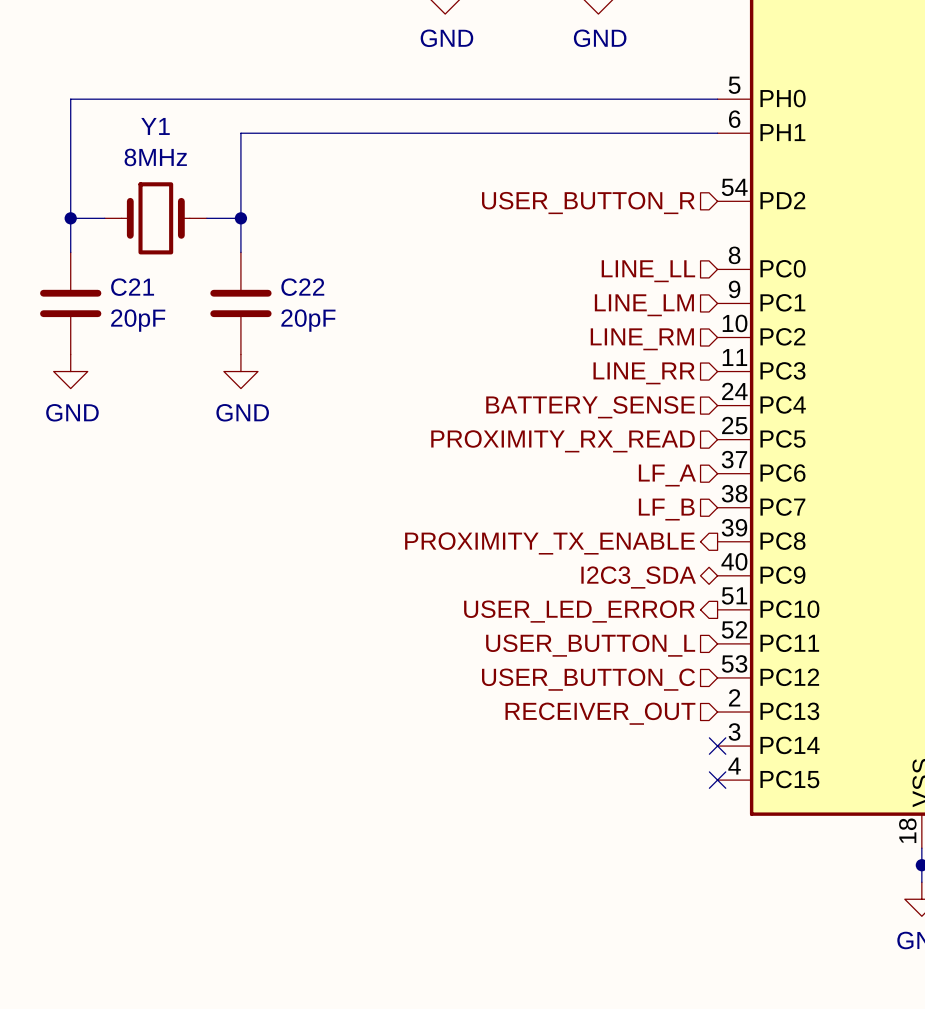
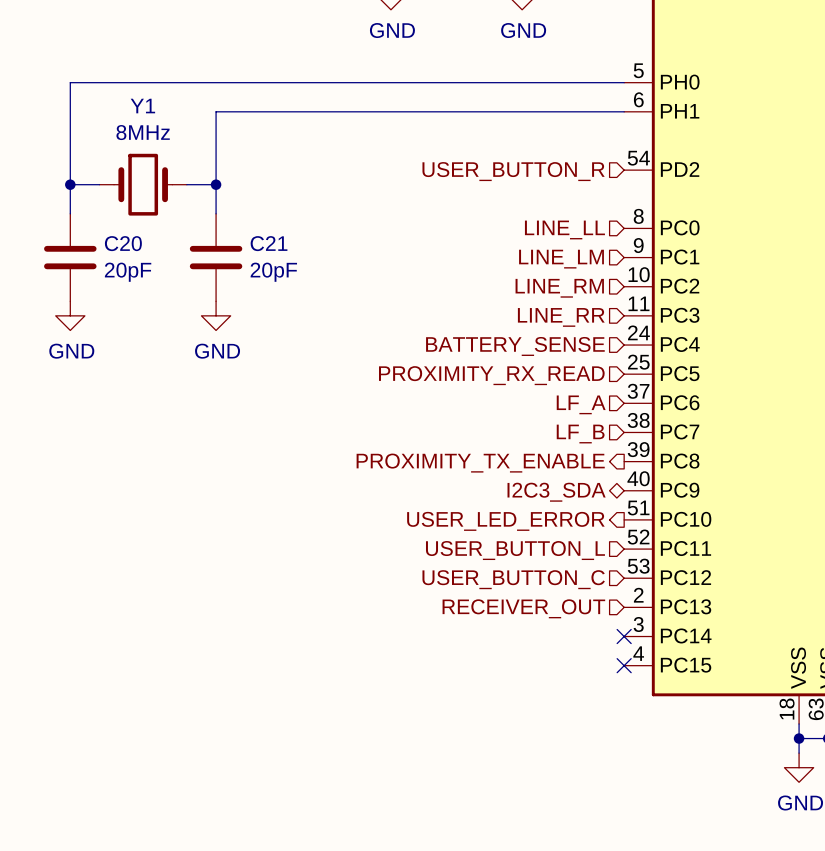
C21 name: C21 (132, 287) -> C20 (123, 243)
C22 name: C22 (302, 287) -> C21 (269, 243)

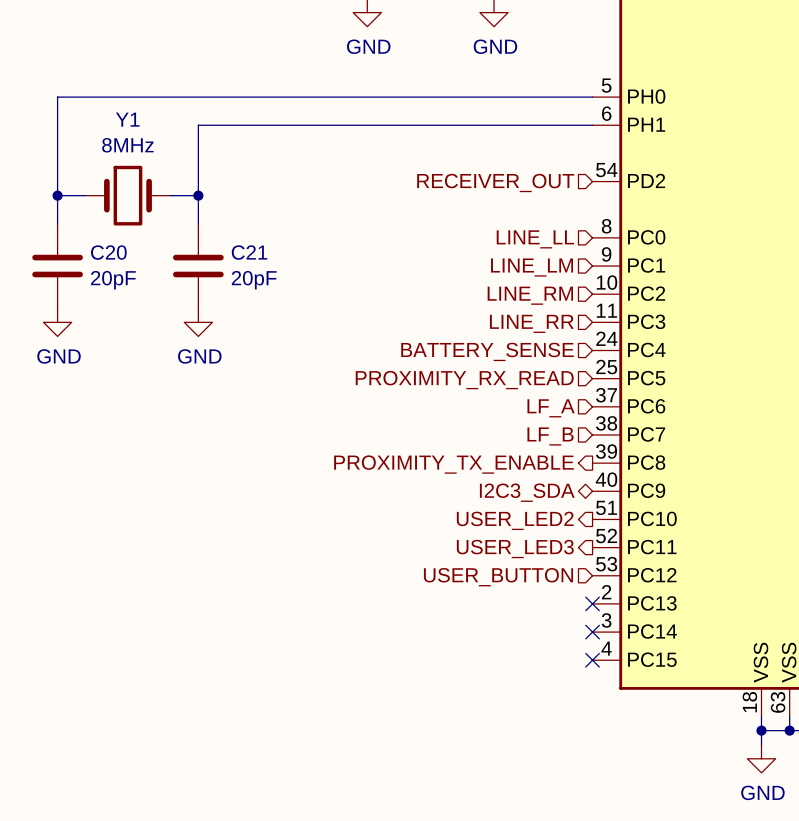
hierarchical label: USER_BUTTON_R (513, 171) -> RECEIVER_OUT (495, 182)
hierarchical label: USER_LED_ERROR (505, 521) -> USER_LED2 (515, 520)
hierarchical label shape: input (515, 550) -> output (515, 549)
hierarchical label: USER_BUTTON_L (515, 550) -> USER_LED3 (515, 549)
hierarchical label: USER_BUTTON_C (513, 579) -> USER_BUTTON (498, 577)
no-connect mark: none -> (592, 603)
hierarchical label: RECEIVER_OUT (523, 608) -> none

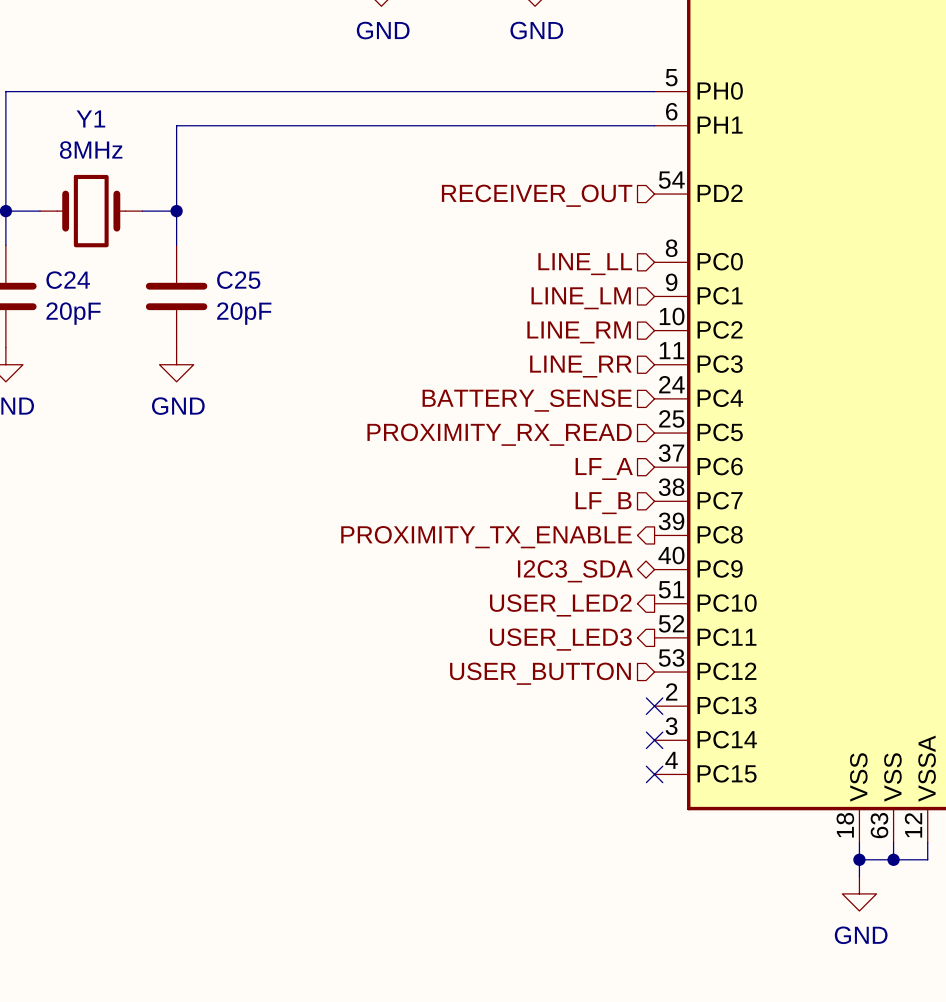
C20 name: C20 (108, 252) -> C24 (68, 280)
C21 name: C21 (249, 252) -> C25 (238, 280)

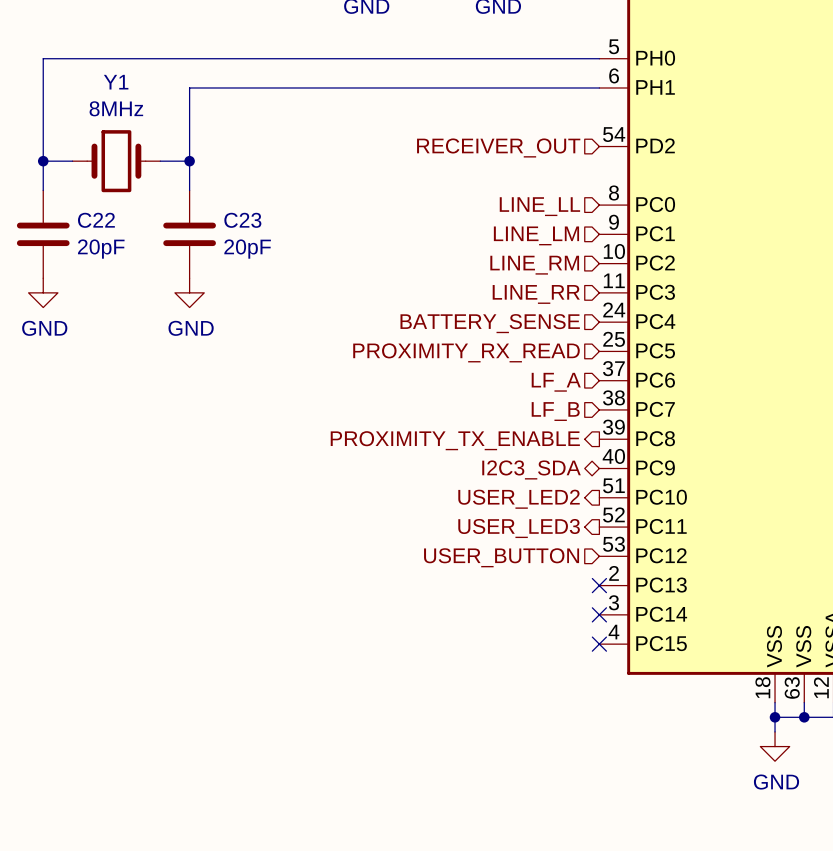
C24 name: C24 (68, 280) -> C22 (96, 220)
C25 name: C25 (238, 280) -> C23 (242, 220)

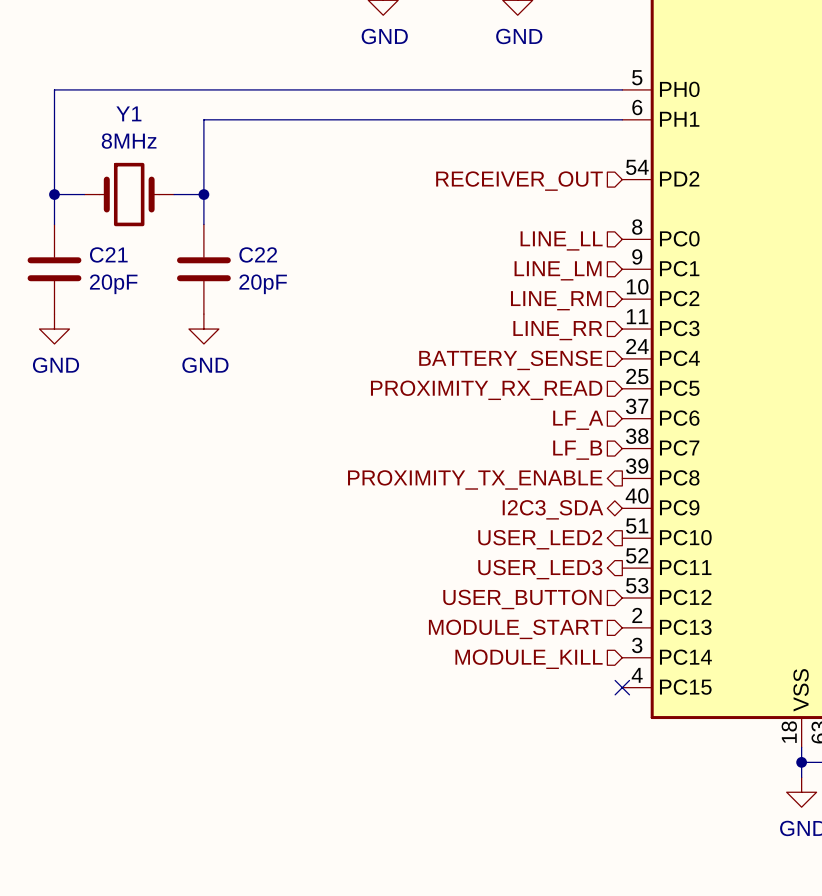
C22 name: C22 (96, 220) -> C21 (108, 254)
C23 name: C23 (242, 220) -> C22 (258, 254)
no-connect mark: (599, 585) -> none
hierarchical label: none -> MODULE_START (515, 629)
no-connect mark: (599, 614) -> none
hierarchical label: none -> MODULE_KILL (529, 659)

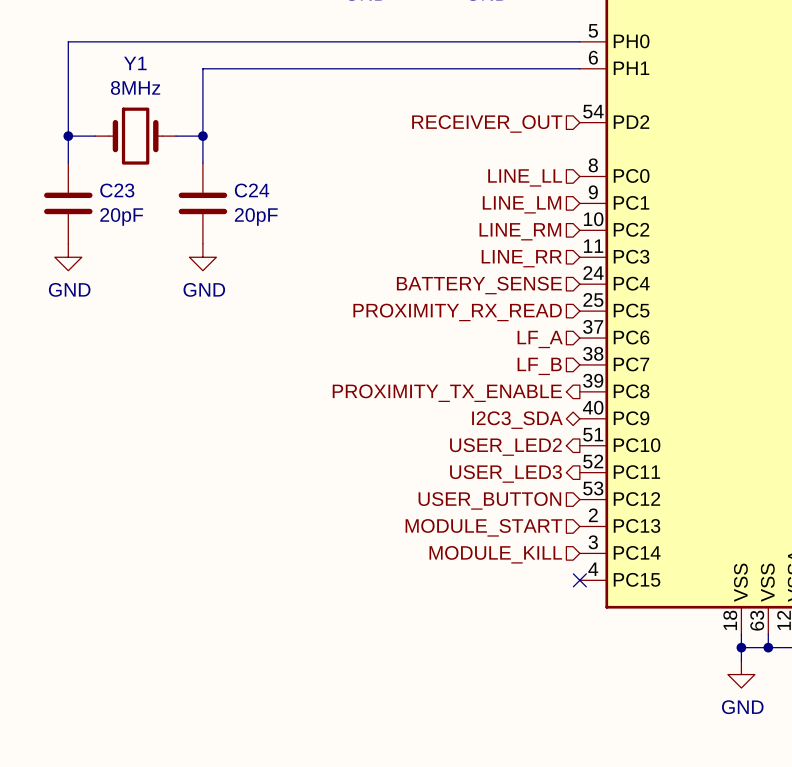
C21 name: C21 (108, 254) -> C23 (117, 190)
C22 name: C22 (258, 254) -> C24 (252, 190)

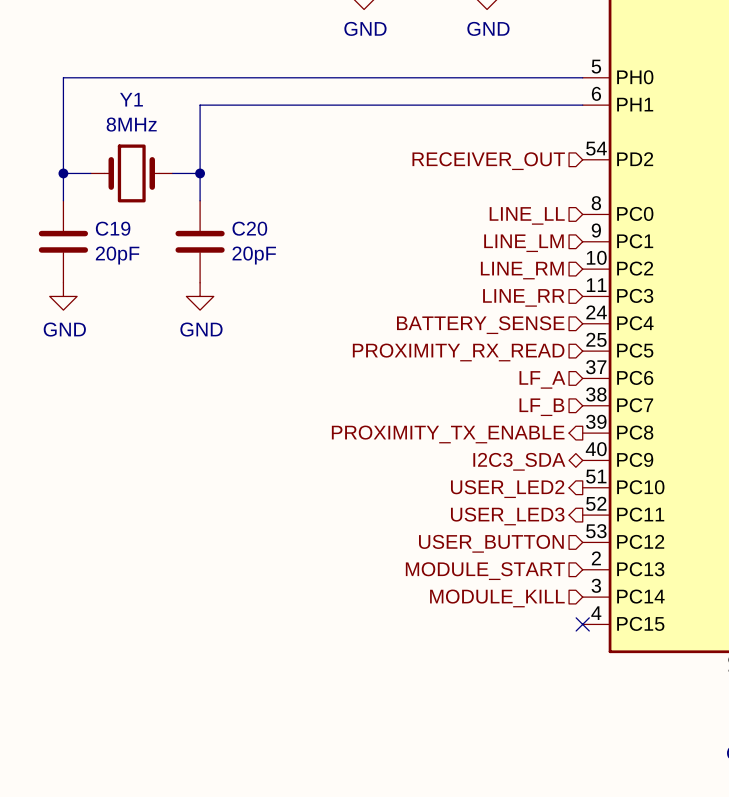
C23 name: C23 (117, 190) -> C19 (113, 228)
C24 name: C24 (252, 190) -> C20 (249, 228)

